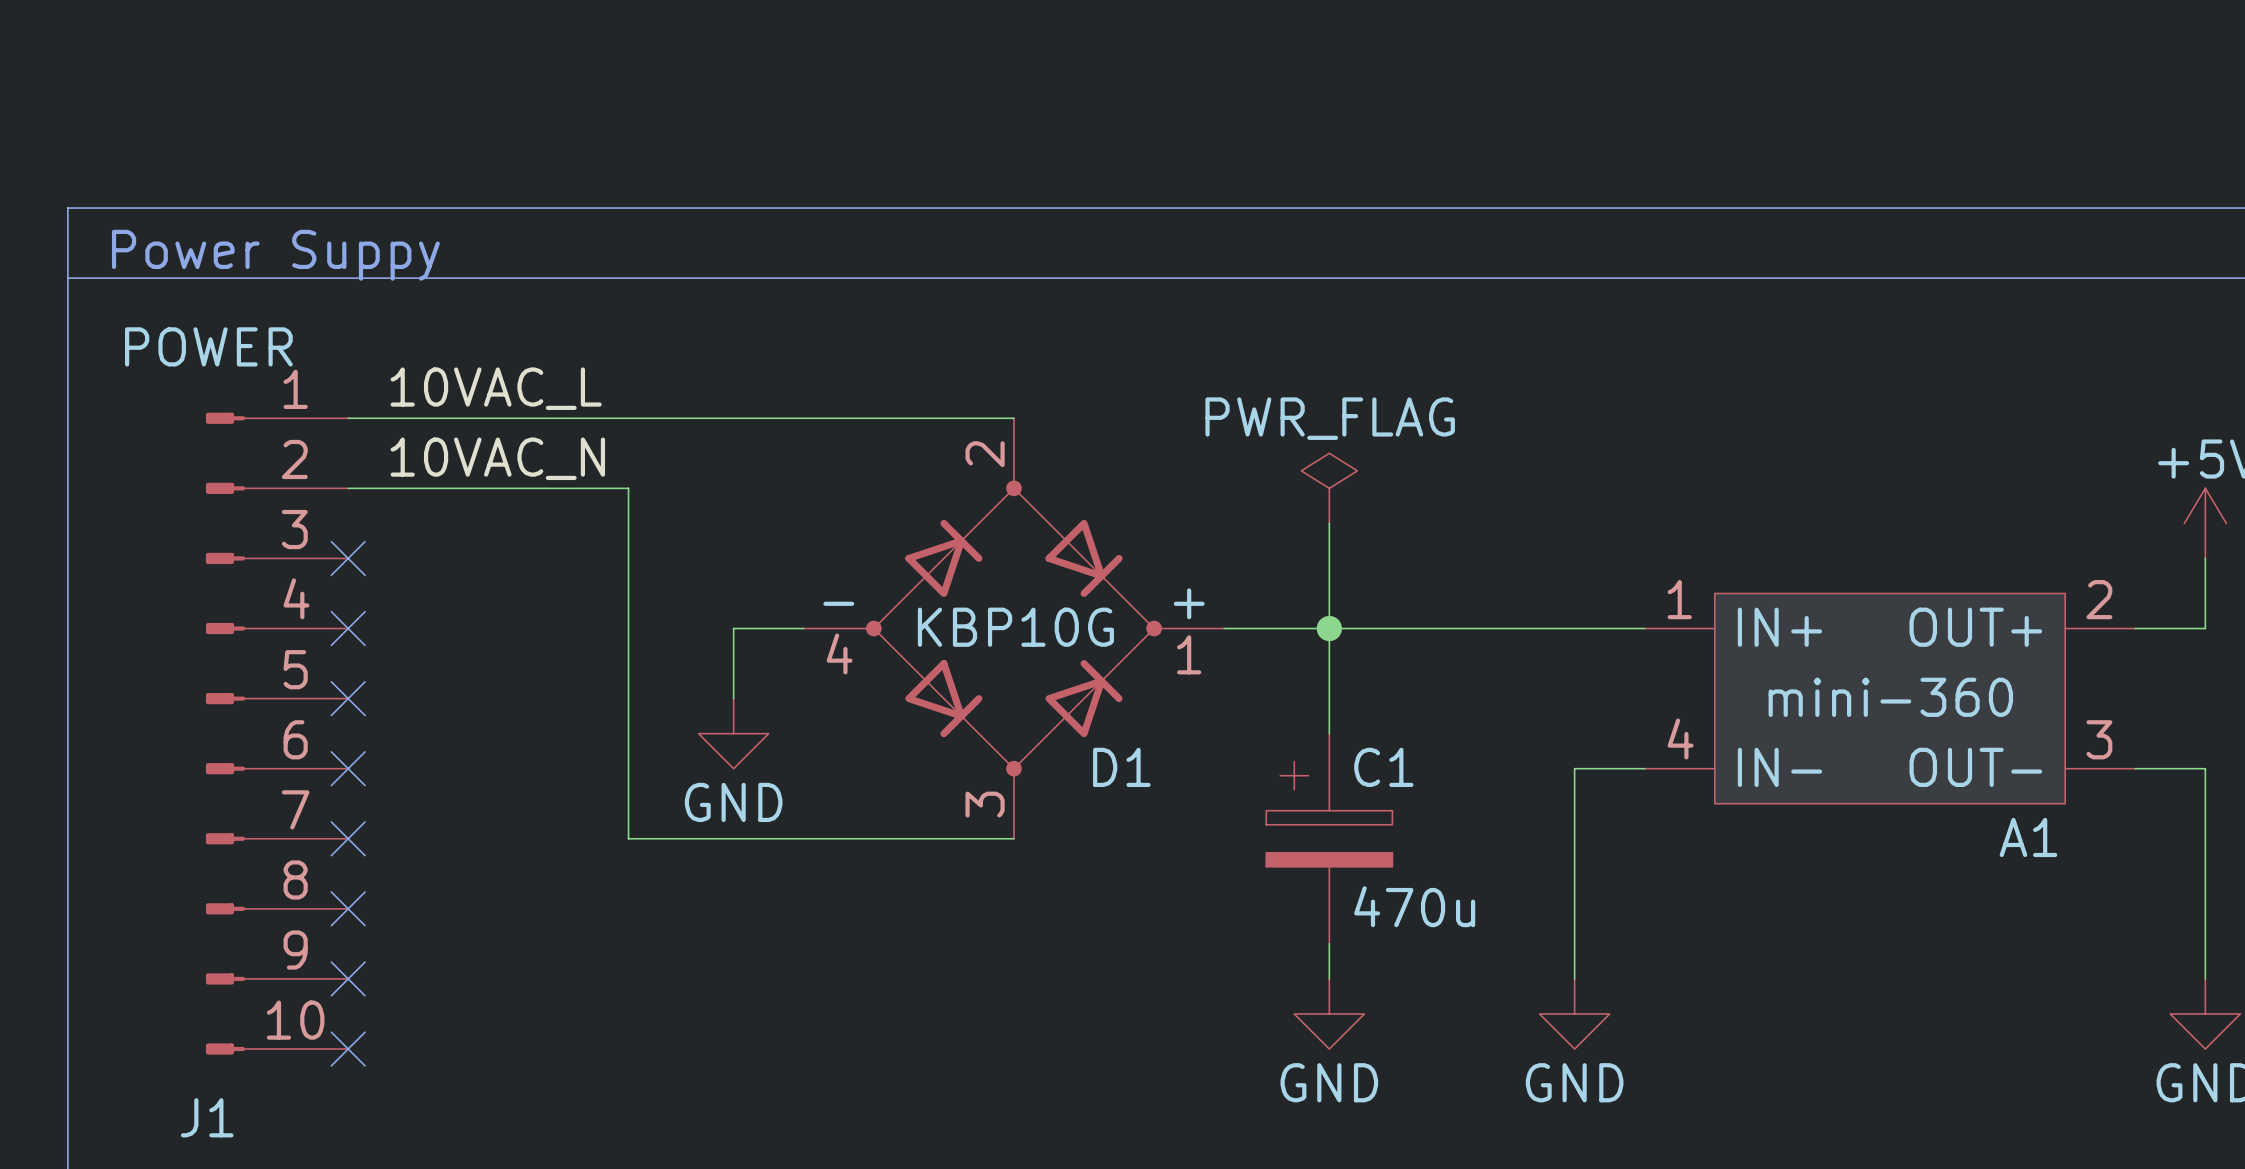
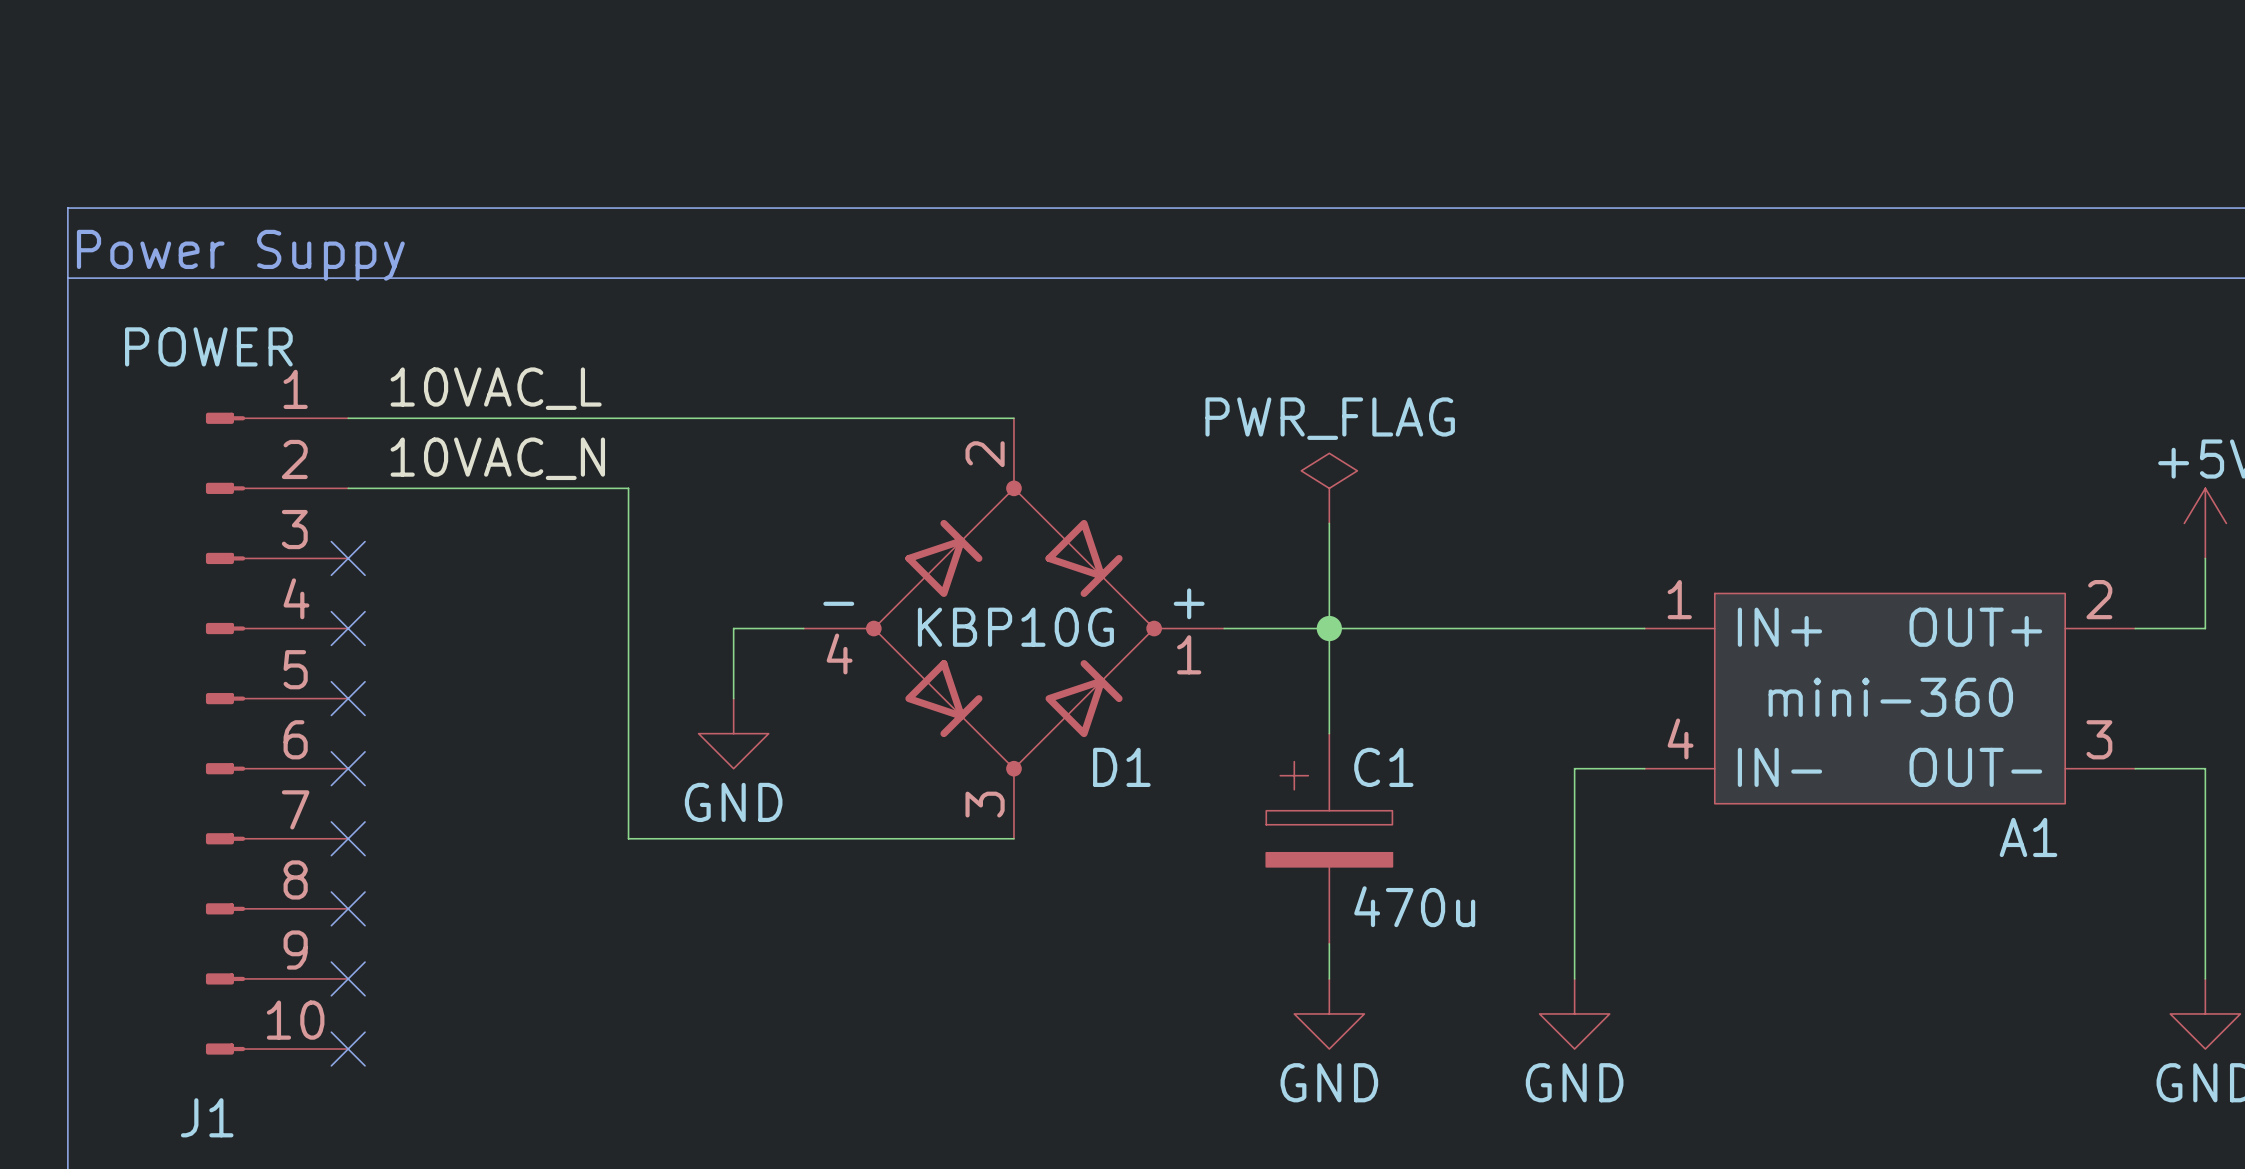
text position: Power Suppy (275, 255) -> Power Suppy (240, 255)

